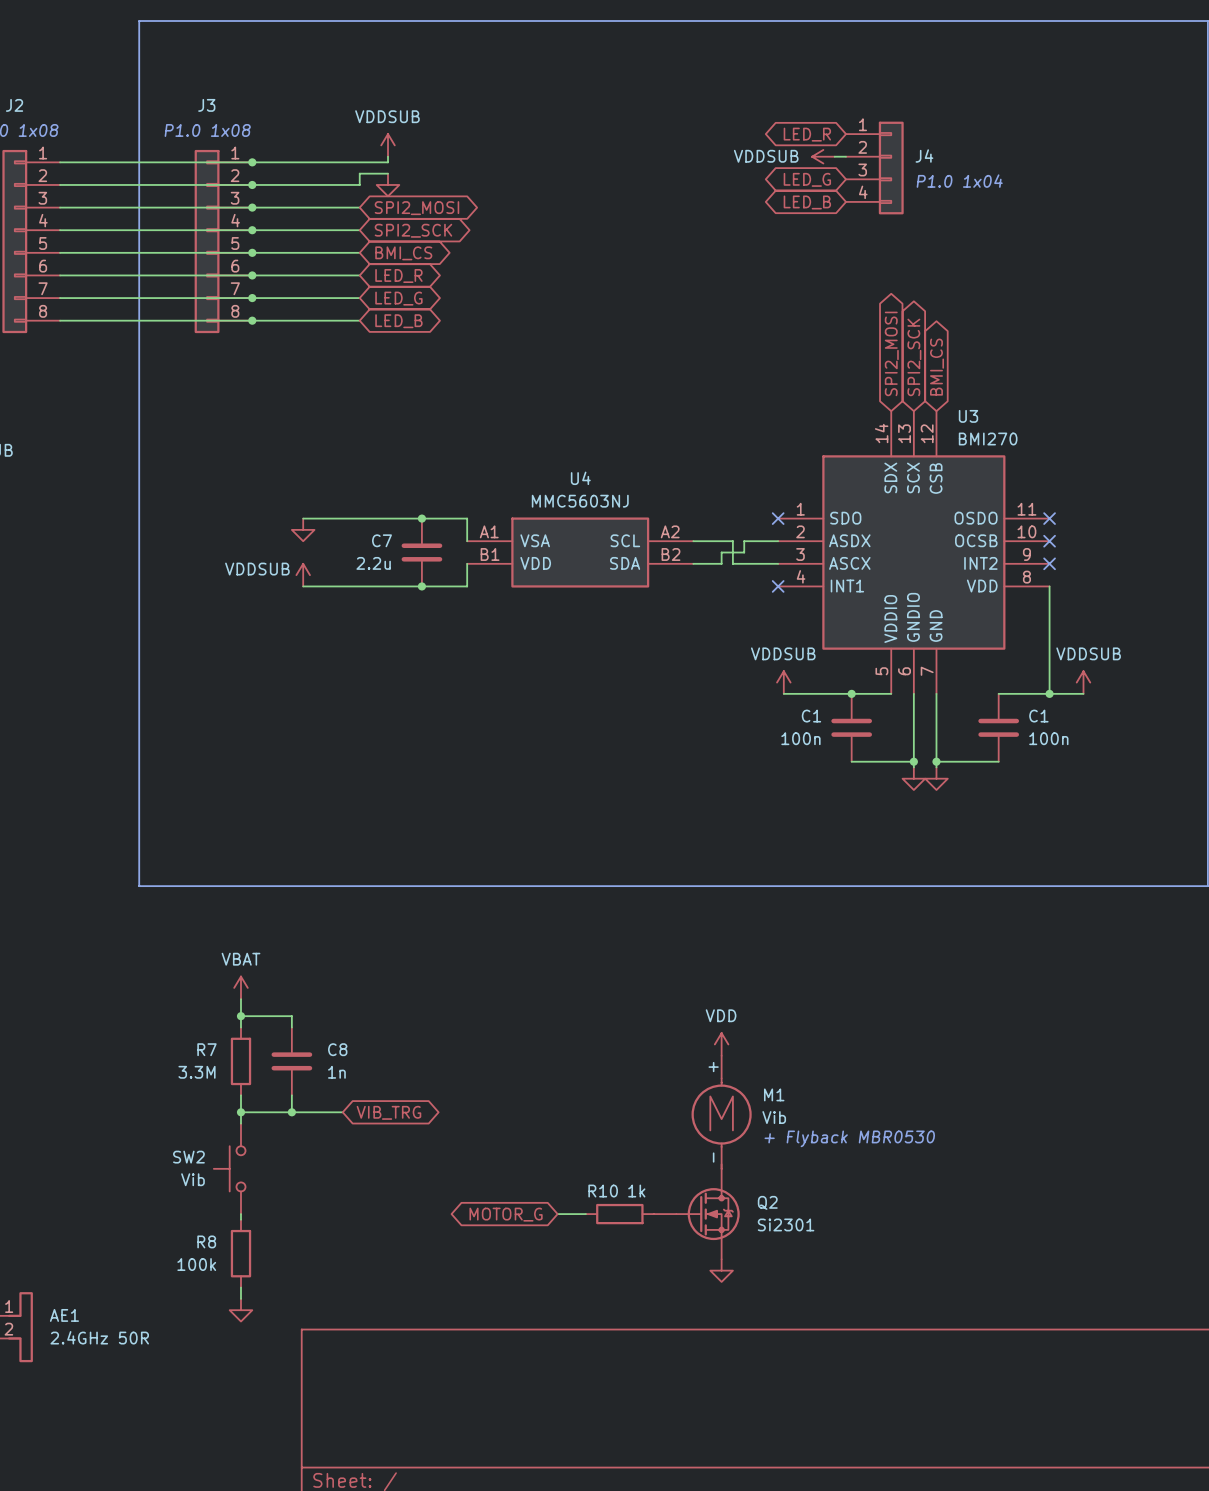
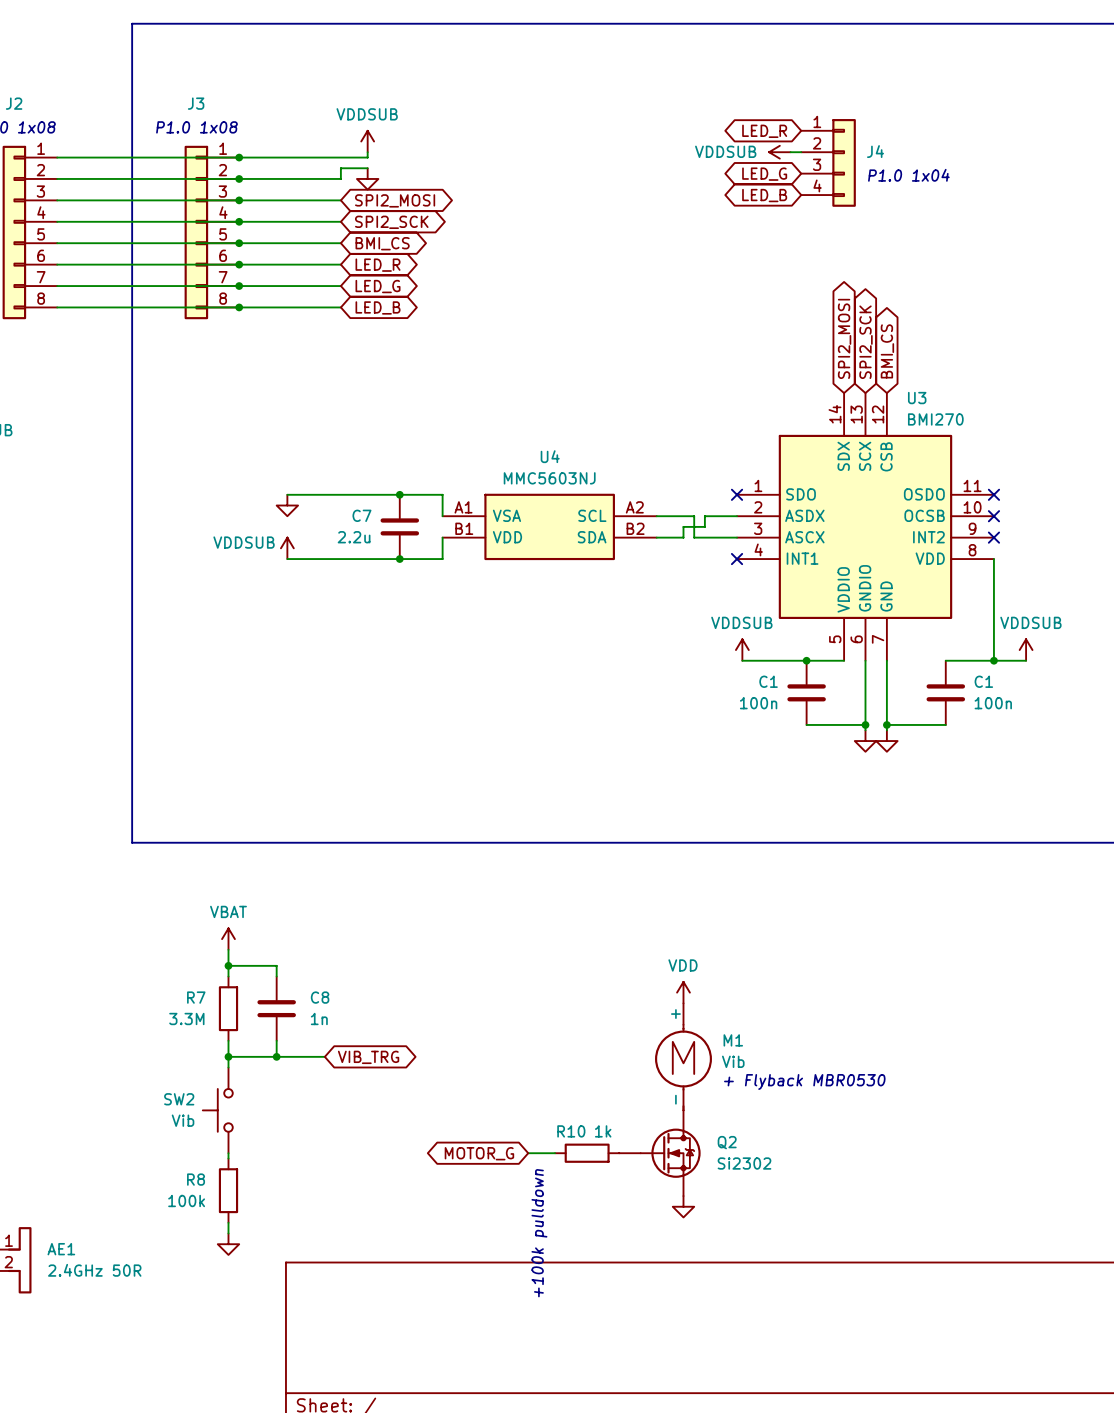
Q2 value: Si2301 (786, 1224) -> Si2302 (744, 1163)
text: none -> +100k pulldown (539, 1233)

